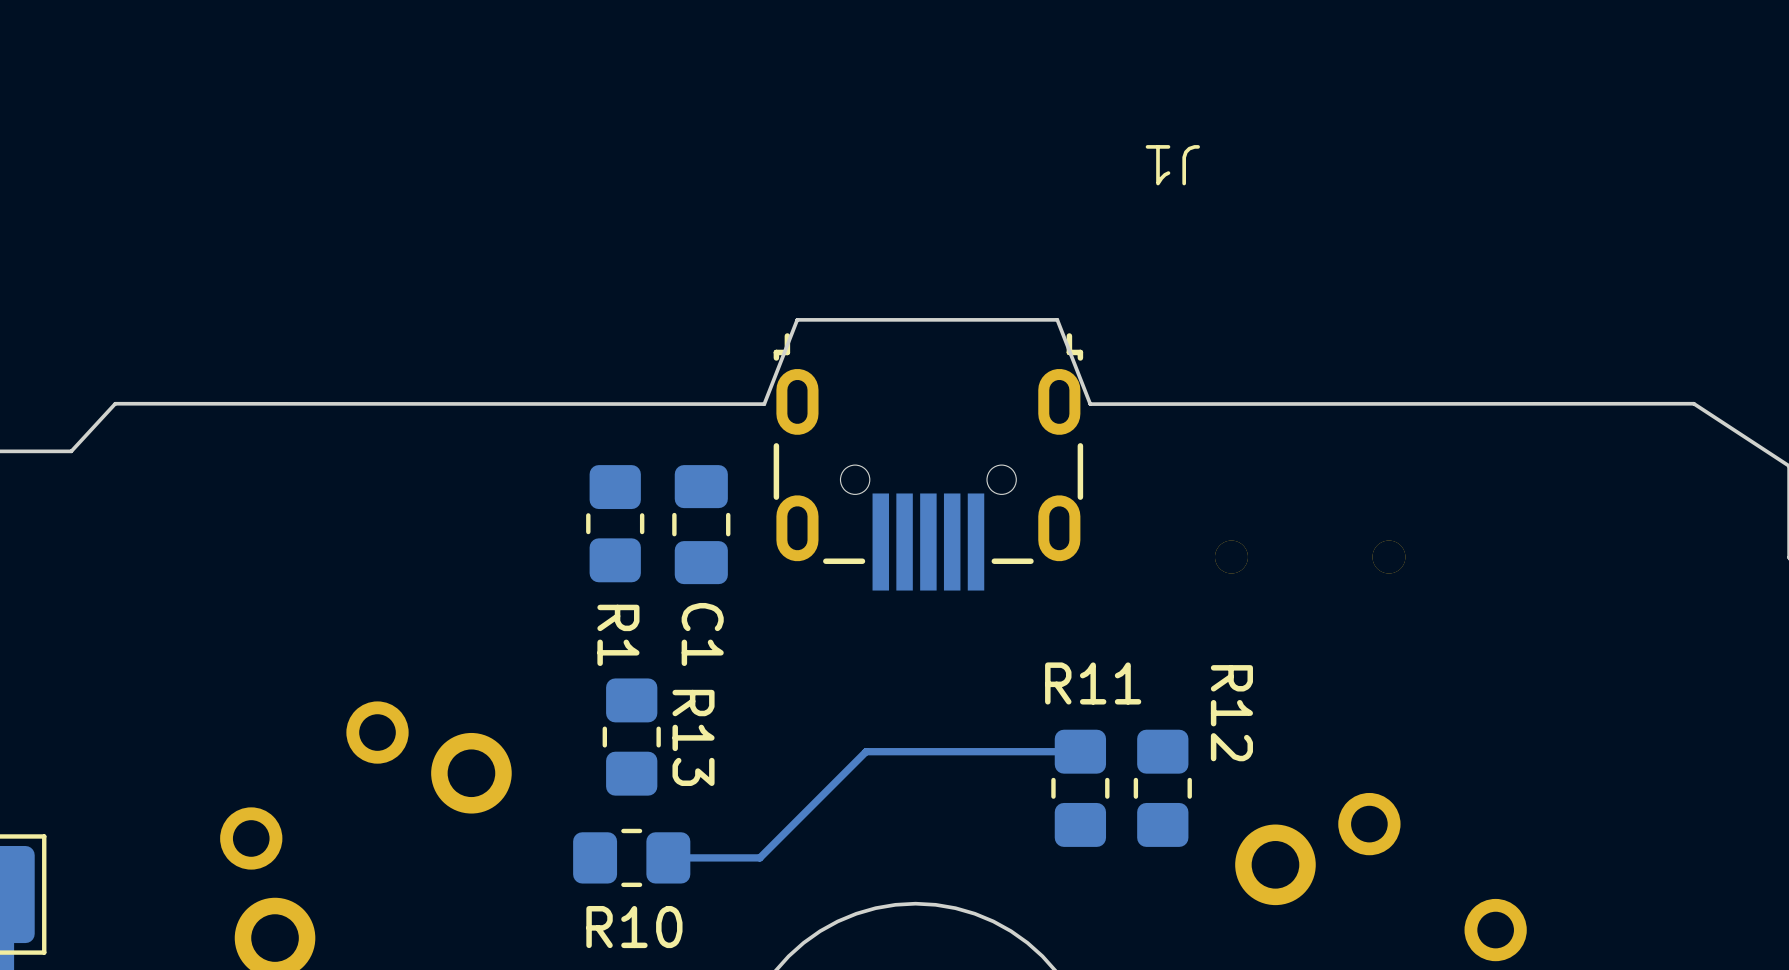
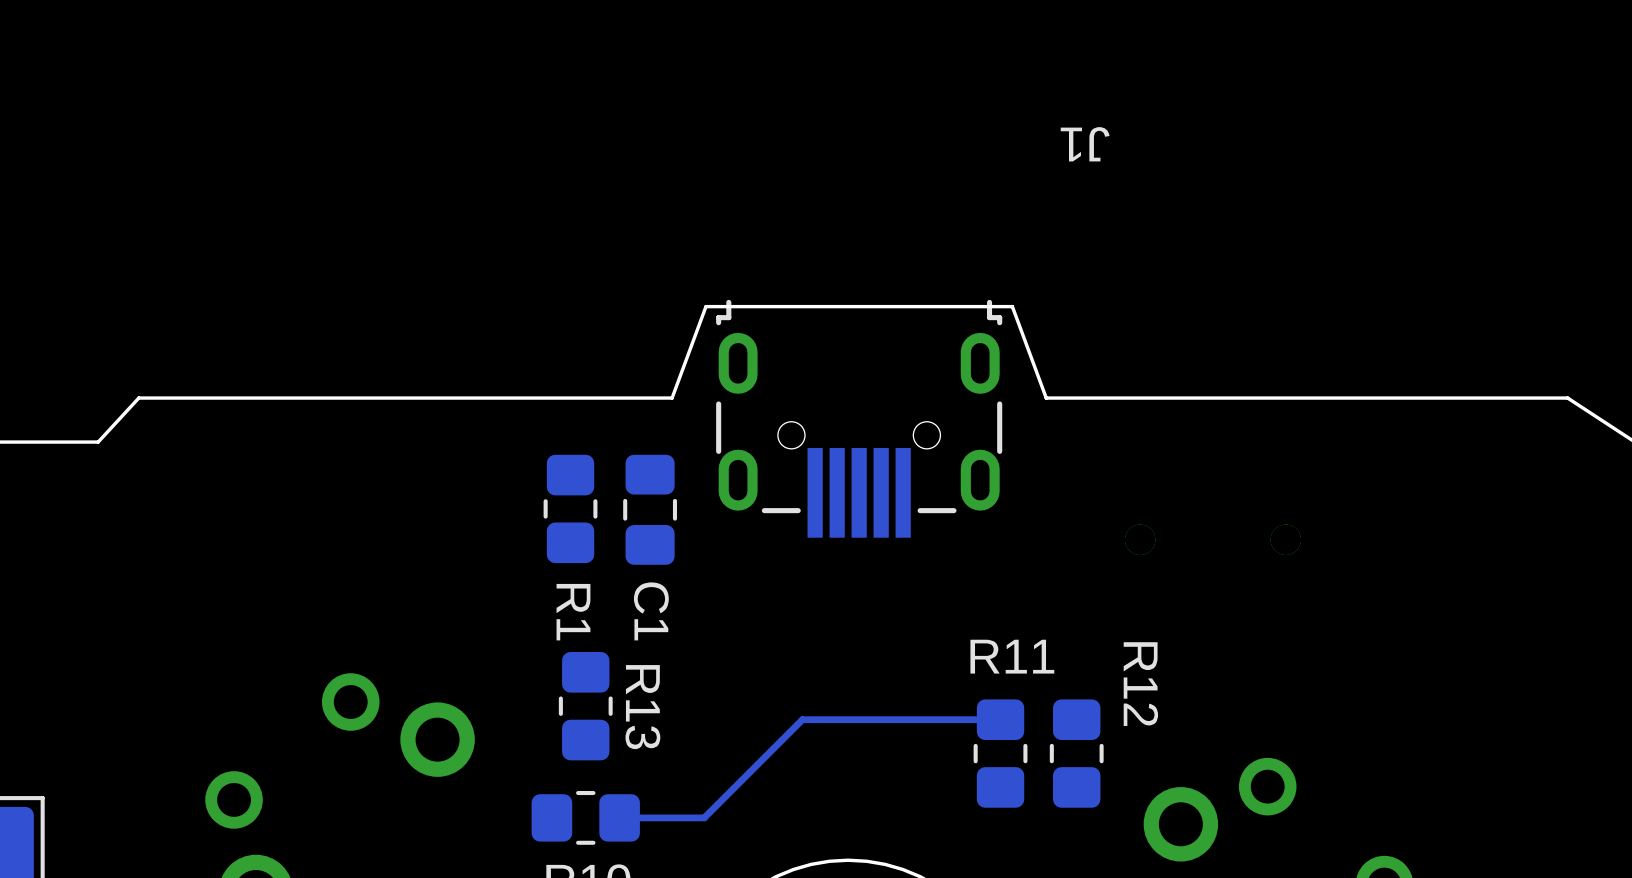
board edge: (1693, 403) (1090, 404) (1057, 319) (797, 319) (764, 404) (115, 403) (71, 451) -> (1567, 398) (1046, 398) (1012, 306) (705, 306) (672, 398) (138, 398) (98, 442) (67, 442)
J1 position: (928, 461) -> (859, 418)

